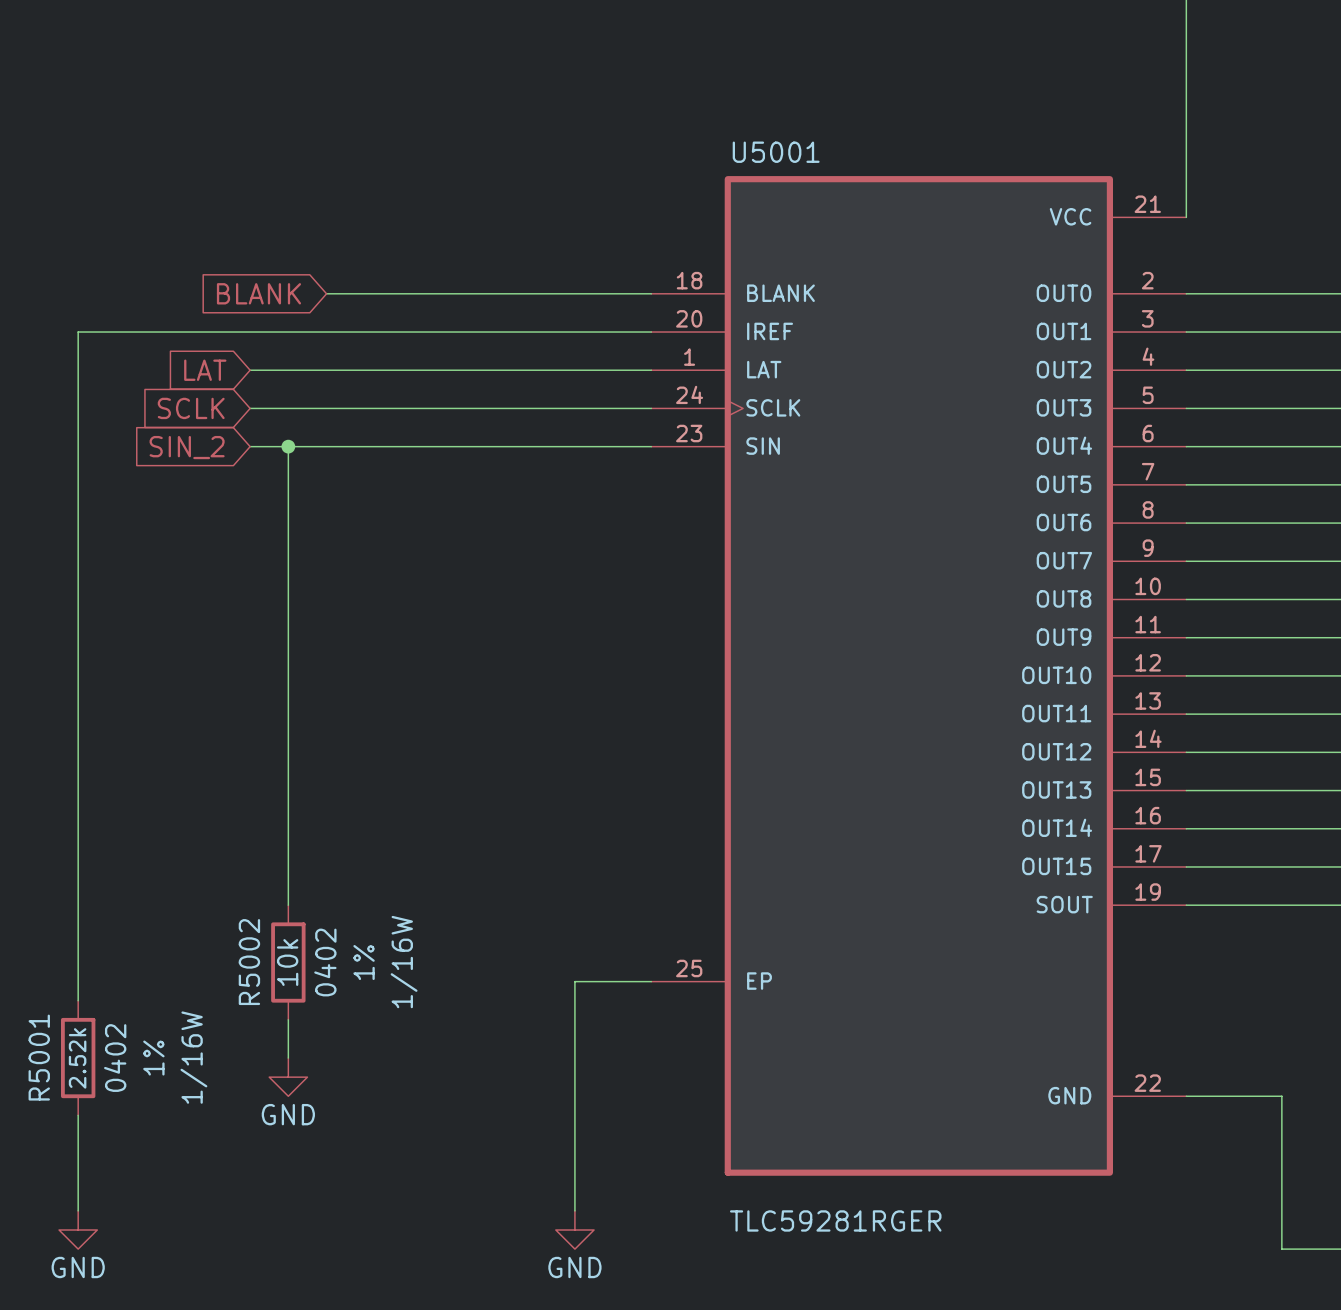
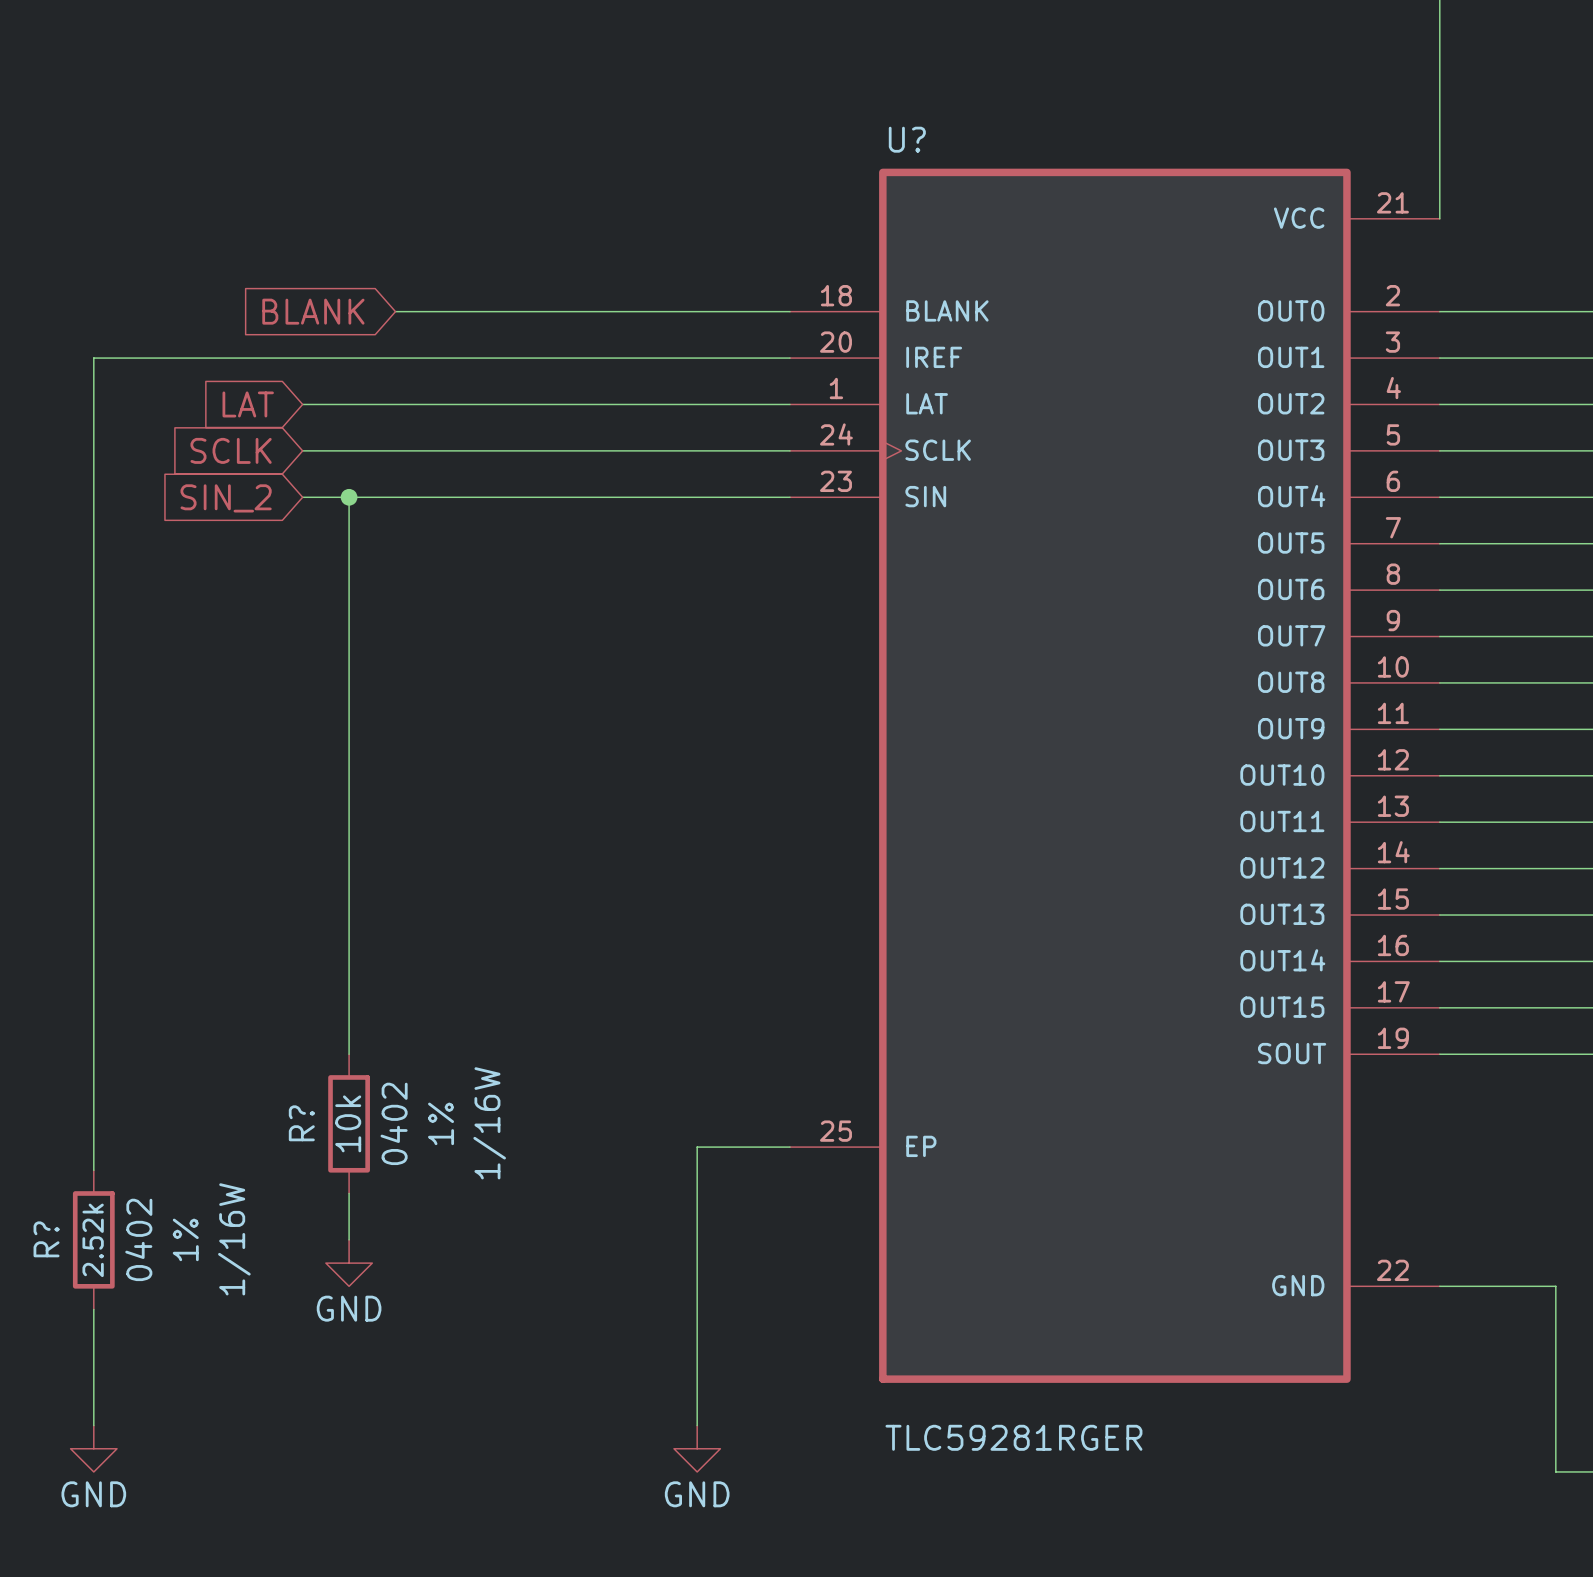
U5001 name: U5001 (776, 152) -> U? (907, 139)
R5002 name: R5002 (249, 962) -> R? (301, 1123)
R5001 name: R5001 (39, 1057) -> R? (46, 1239)

